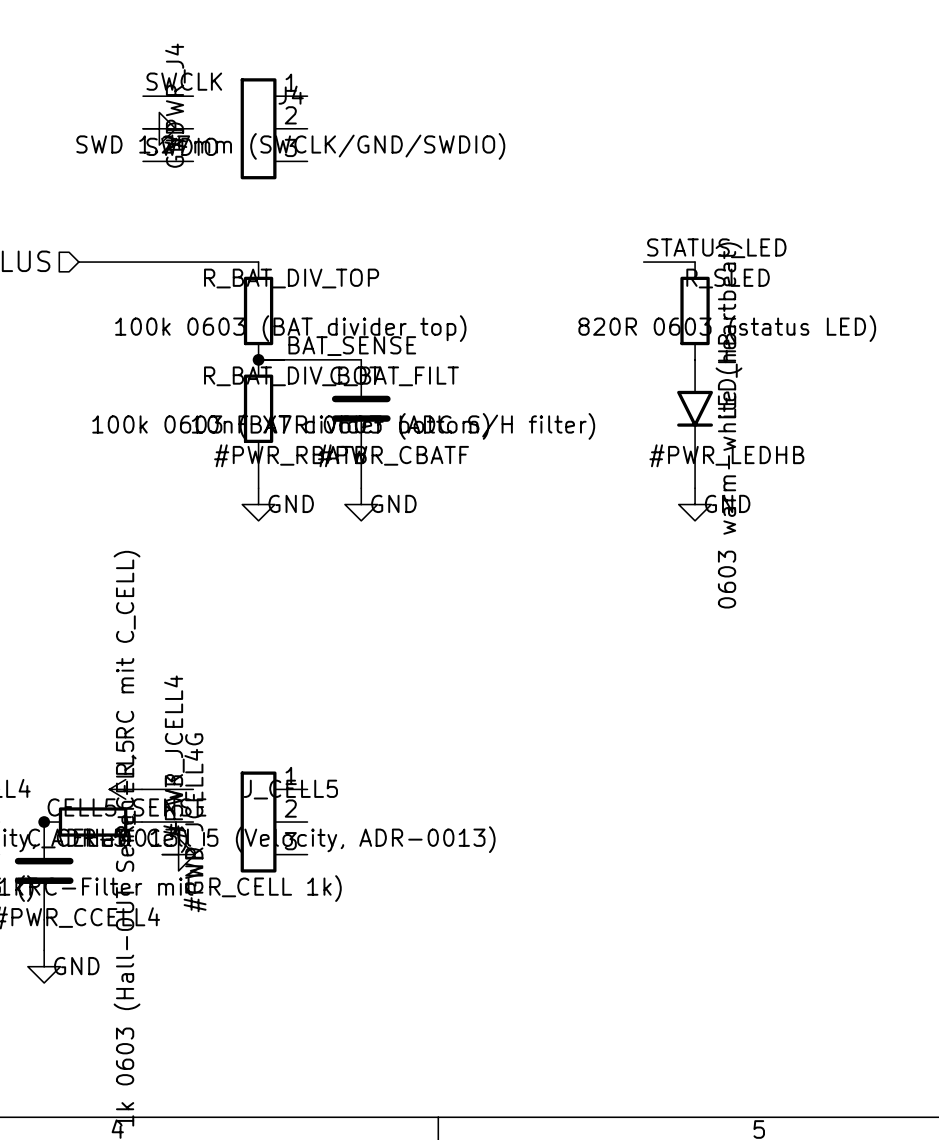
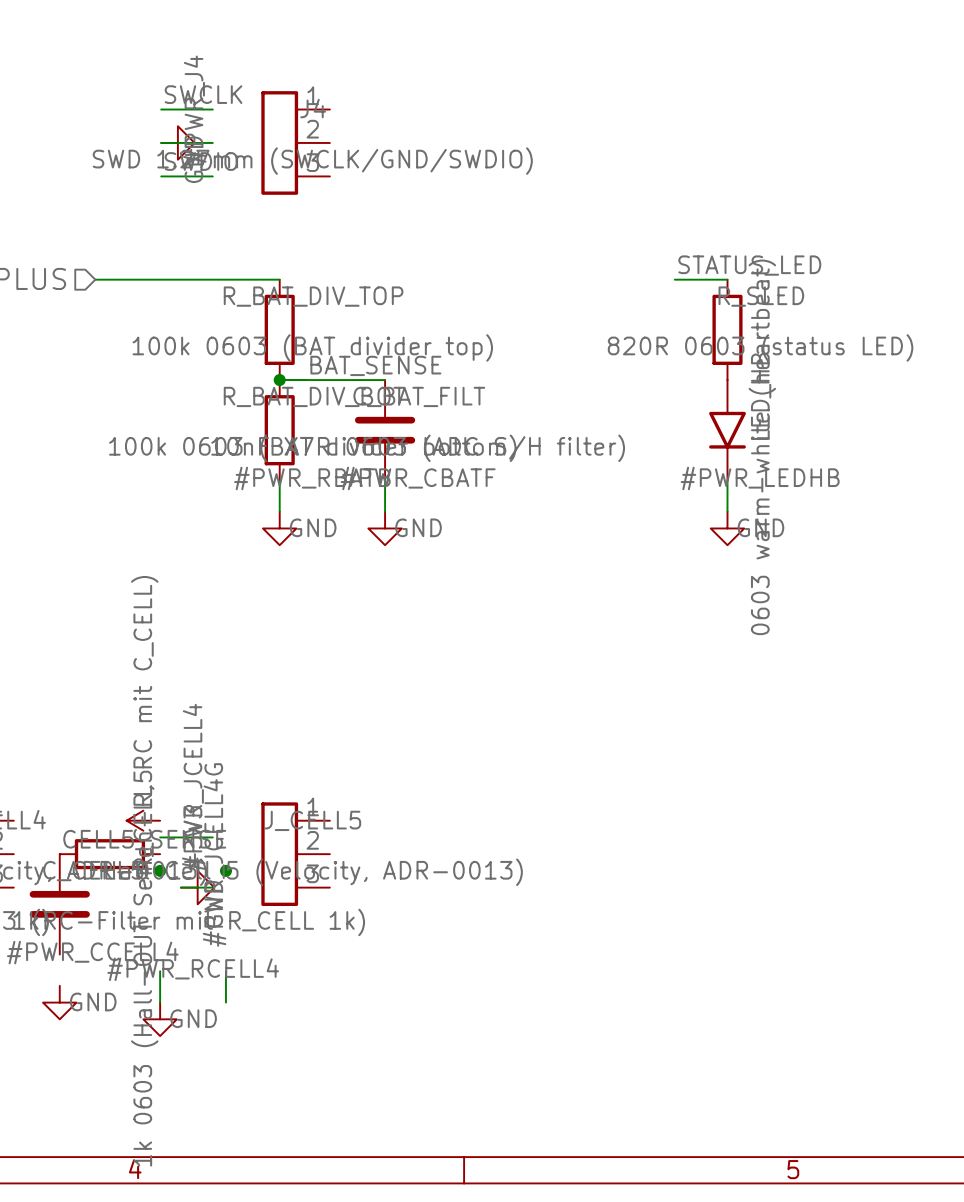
wire: (142, 789) (193, 789) -> none
junction: (44, 822) -> none
wire: (142, 822) (193, 822) -> (160, 837) (212, 837)
junction: none -> (160, 870)
junction: none -> (225, 870)
wire: (44, 919) (44, 950) -> (160, 971) (160, 1002)
wire: none -> (225, 971) (225, 1002)
#PWR_RCELL4: none -> GND (160, 1019)

